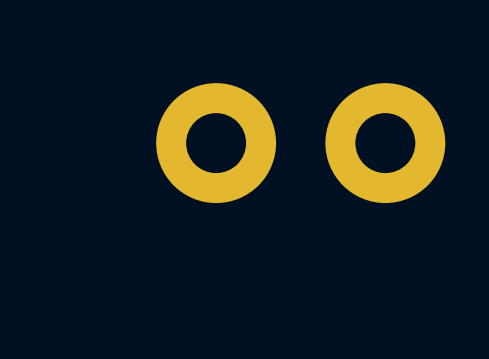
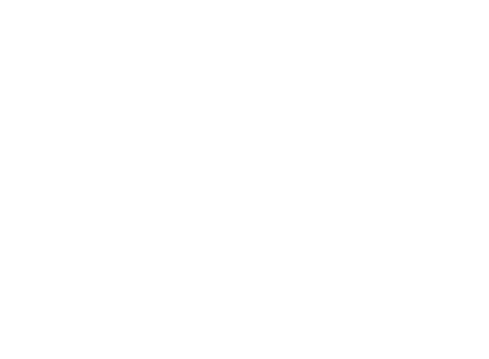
part: (300, 143) -> none

